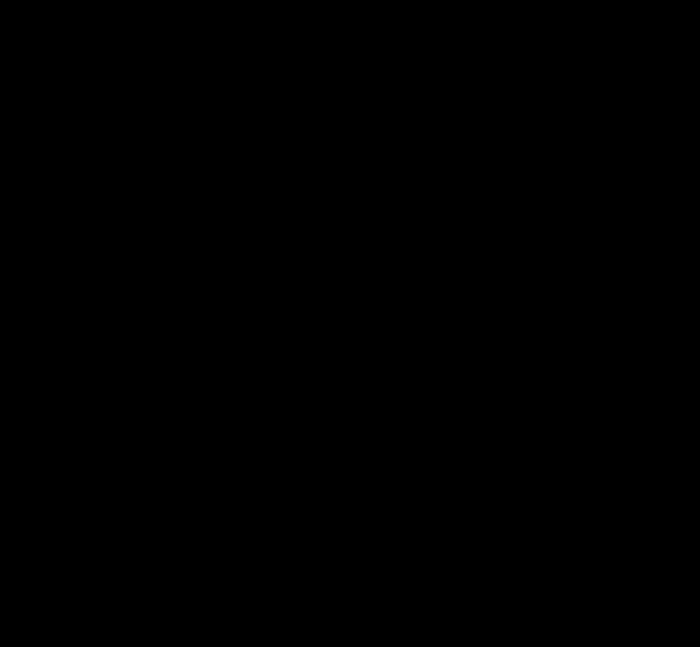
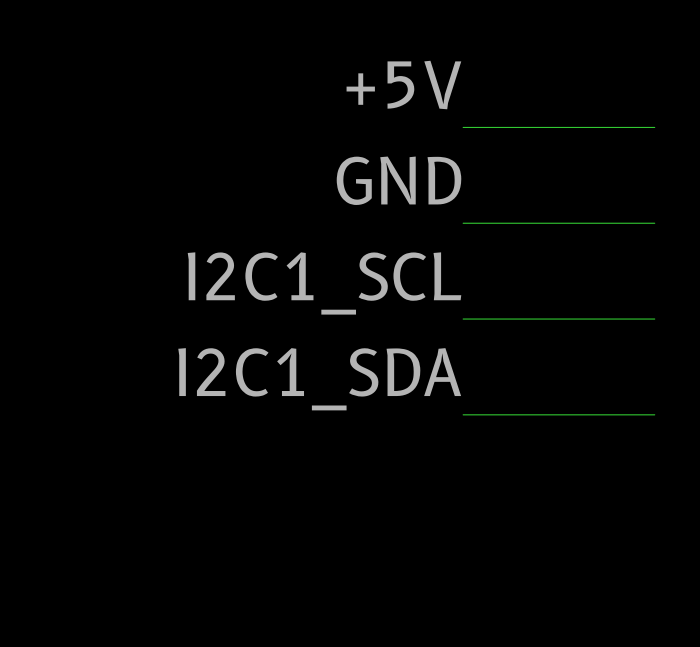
label: none -> +5V (403, 85)
wire: none -> (463, 127) (654, 127)
label: none -> GND (398, 180)
wire: none -> (463, 223) (654, 223)
label: none -> I2C1_SCL (324, 283)
wire: none -> (463, 319) (654, 319)
label: none -> I2C1_SDA (319, 379)
wire: none -> (463, 414) (654, 414)

